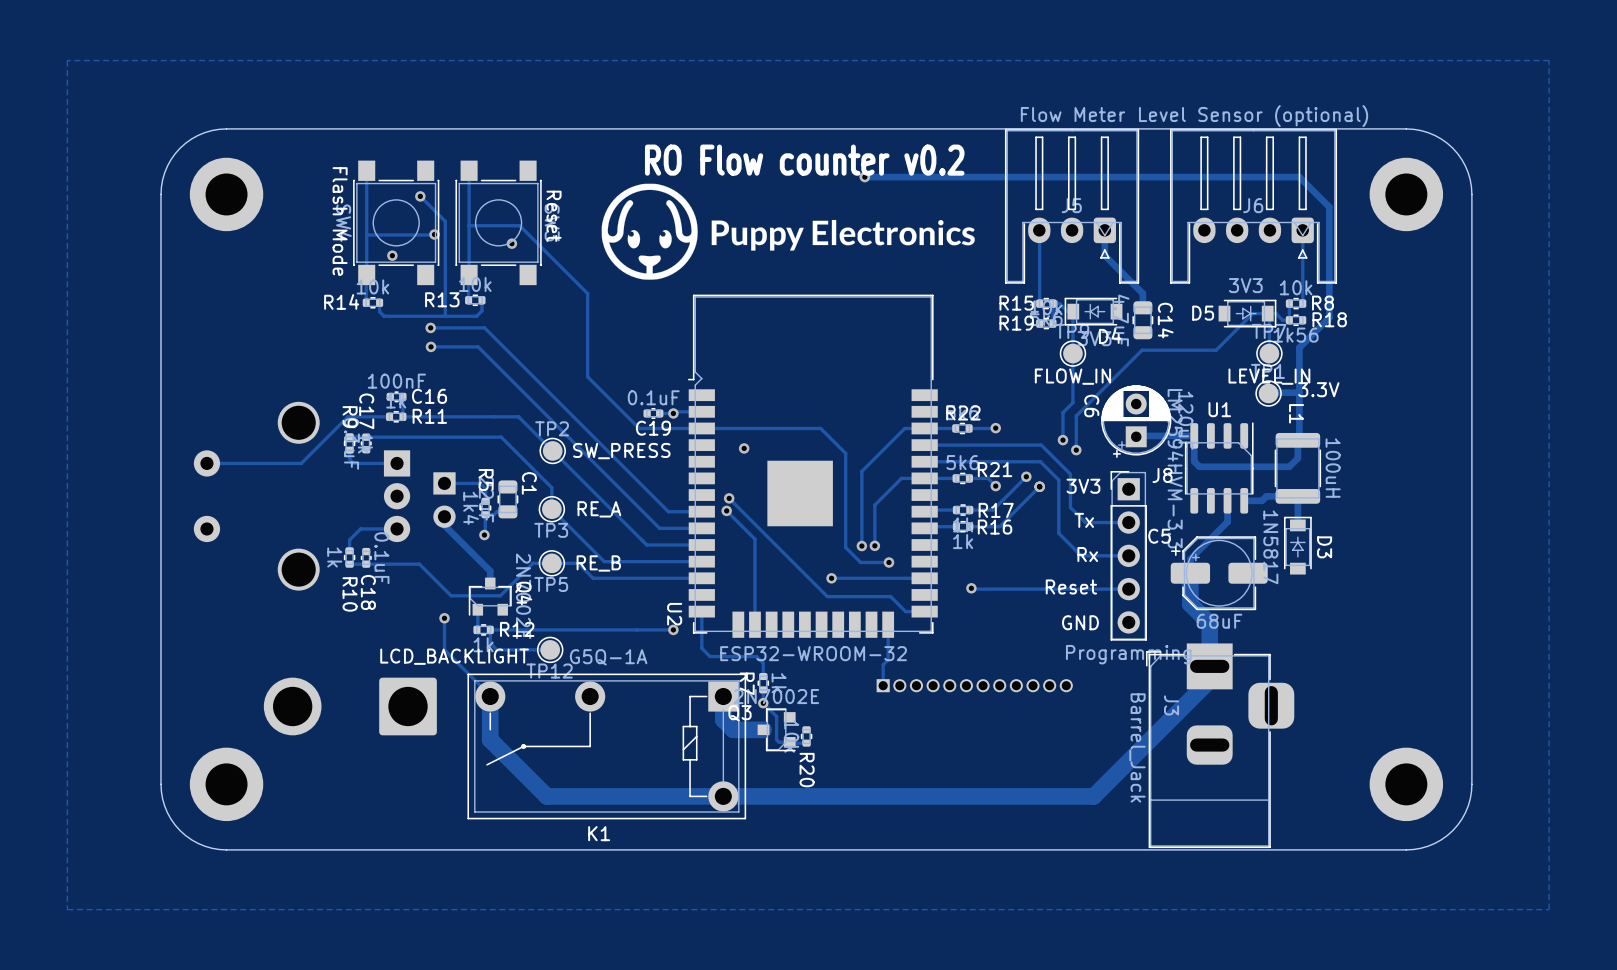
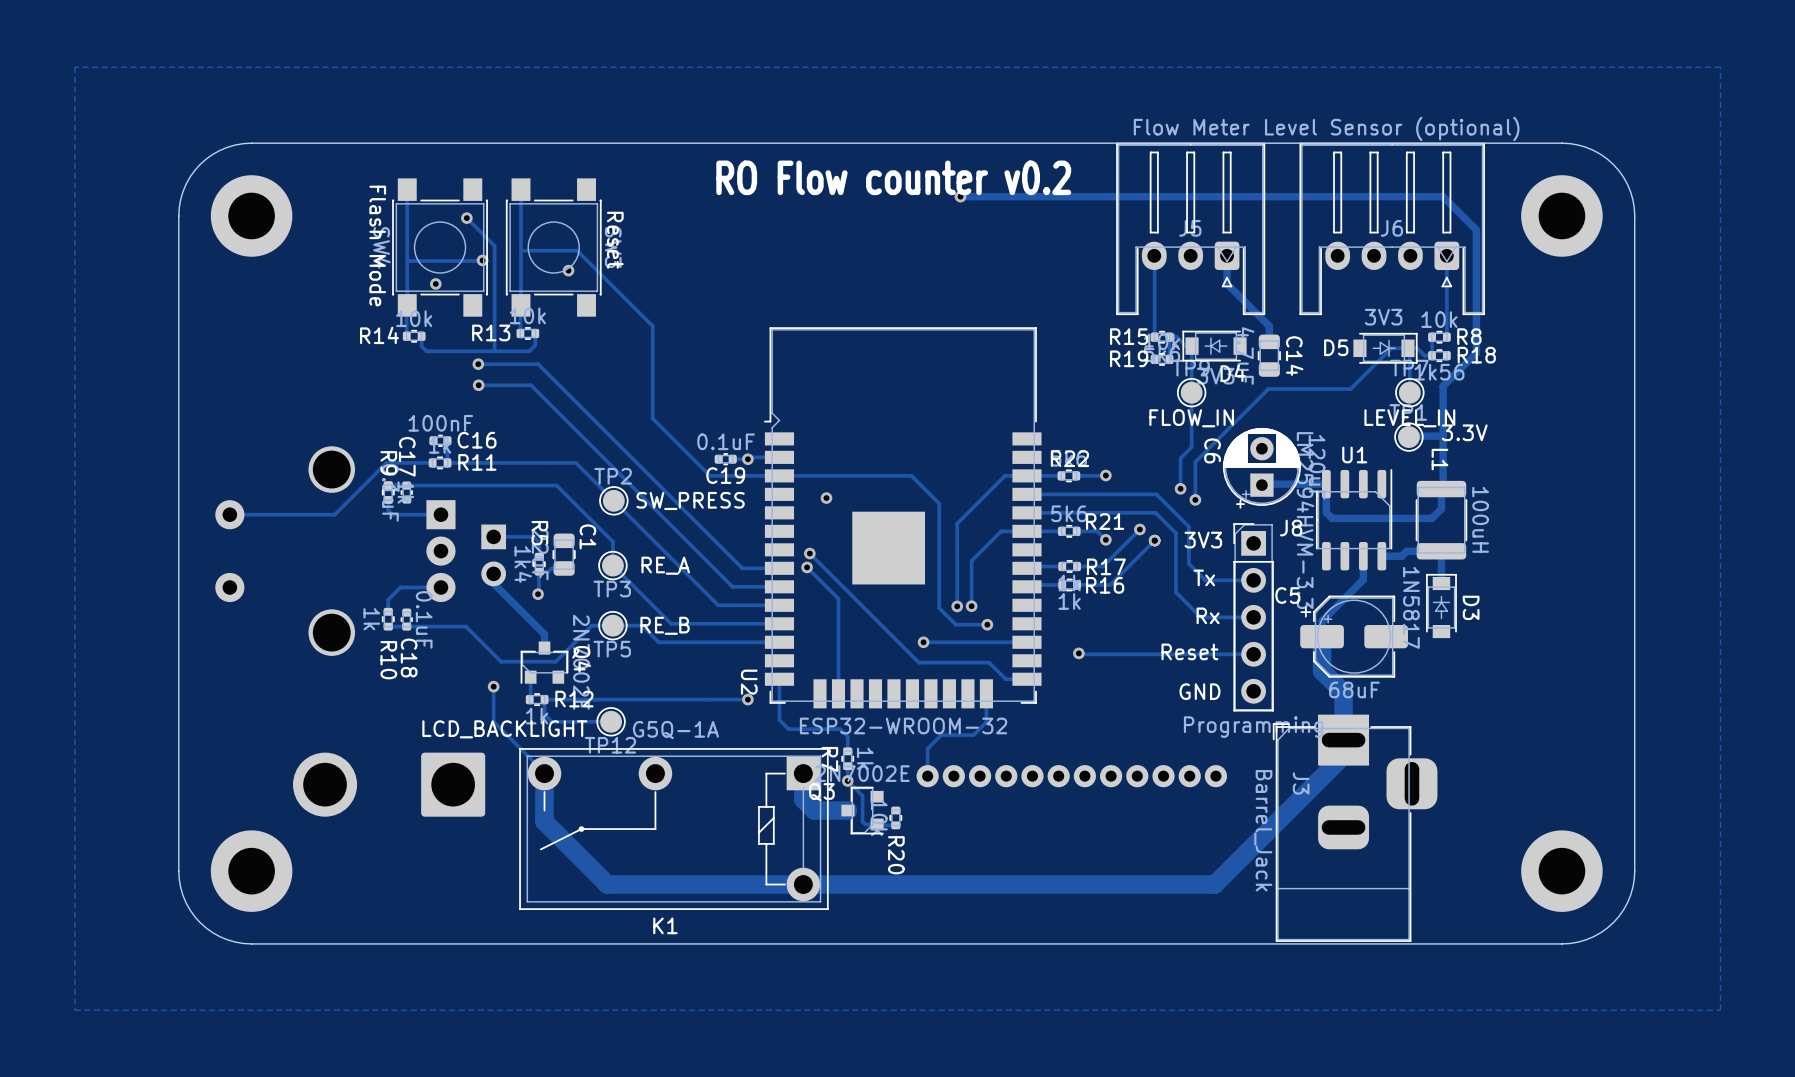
drawing: [601, 183, 975, 280] -> none
track: (888, 650) (888, 659) (883, 664) (883, 685) -> (986, 722) (973, 735) (941, 735) (927, 748) (927, 776)
part: (974, 685) -> none
part: none -> (1071, 776)

